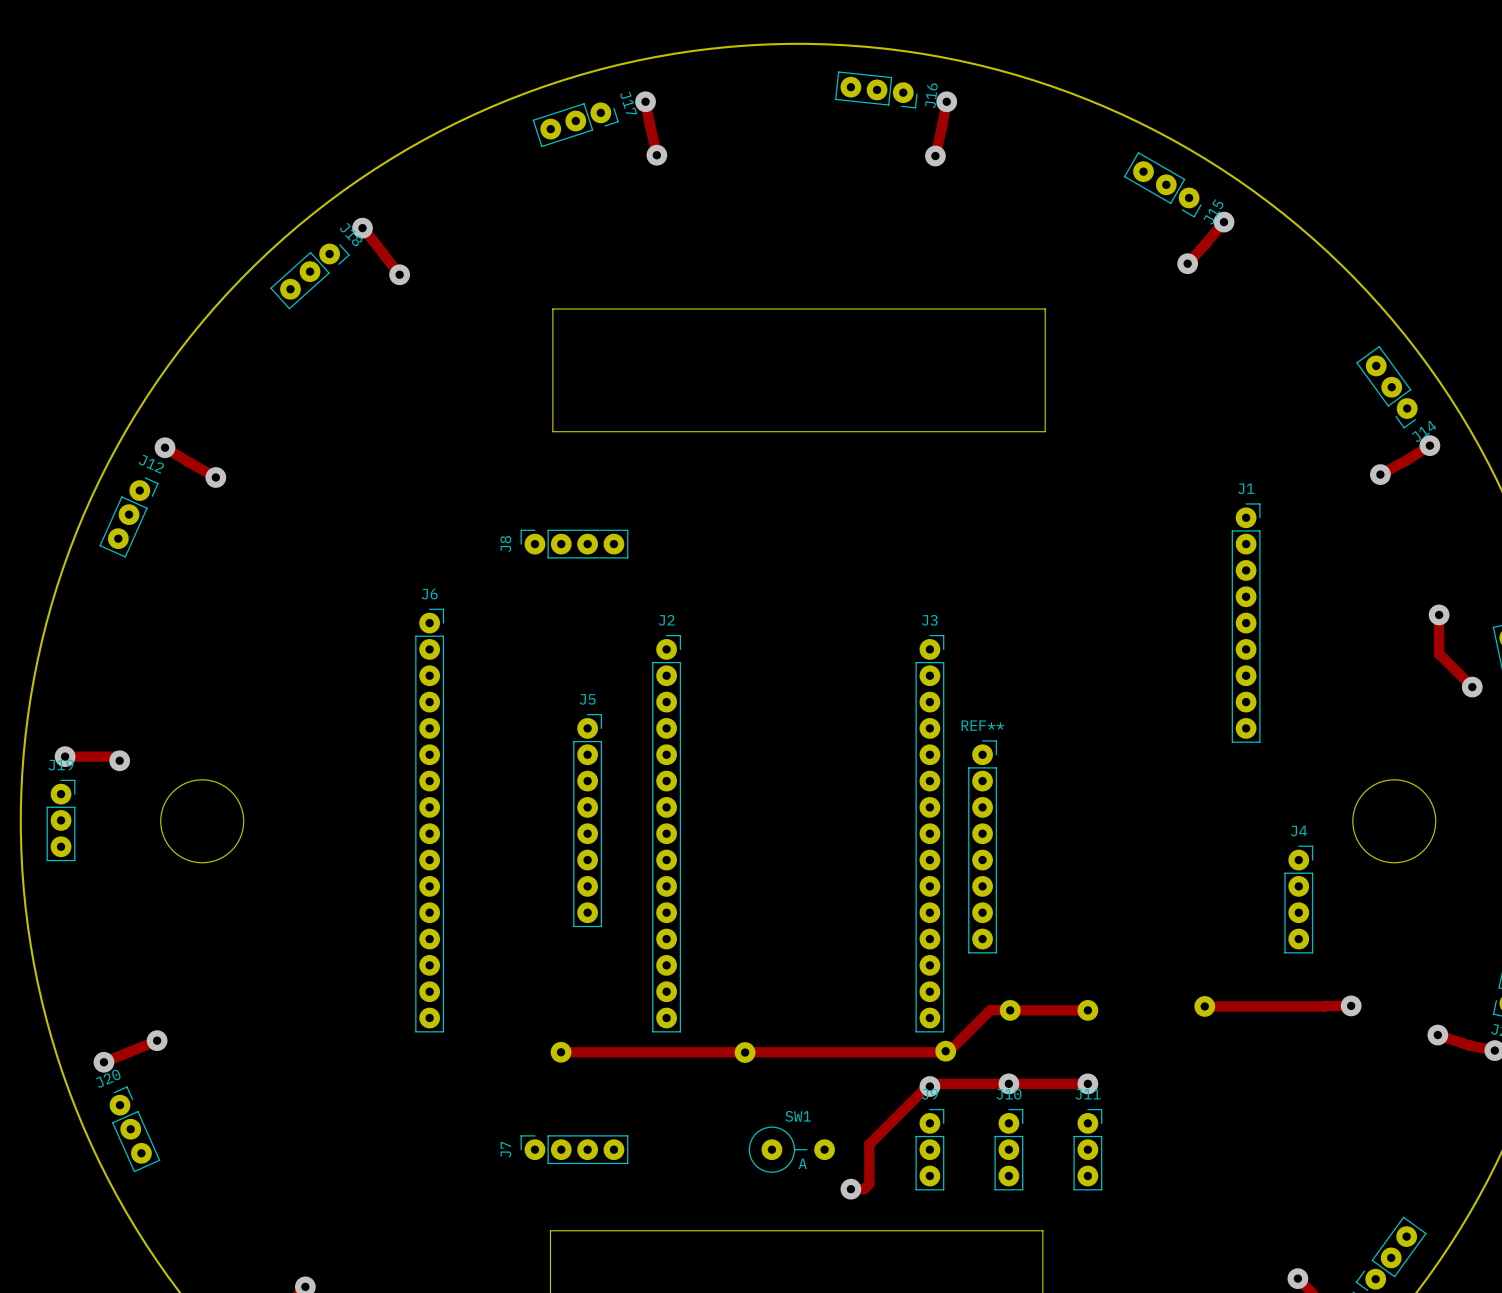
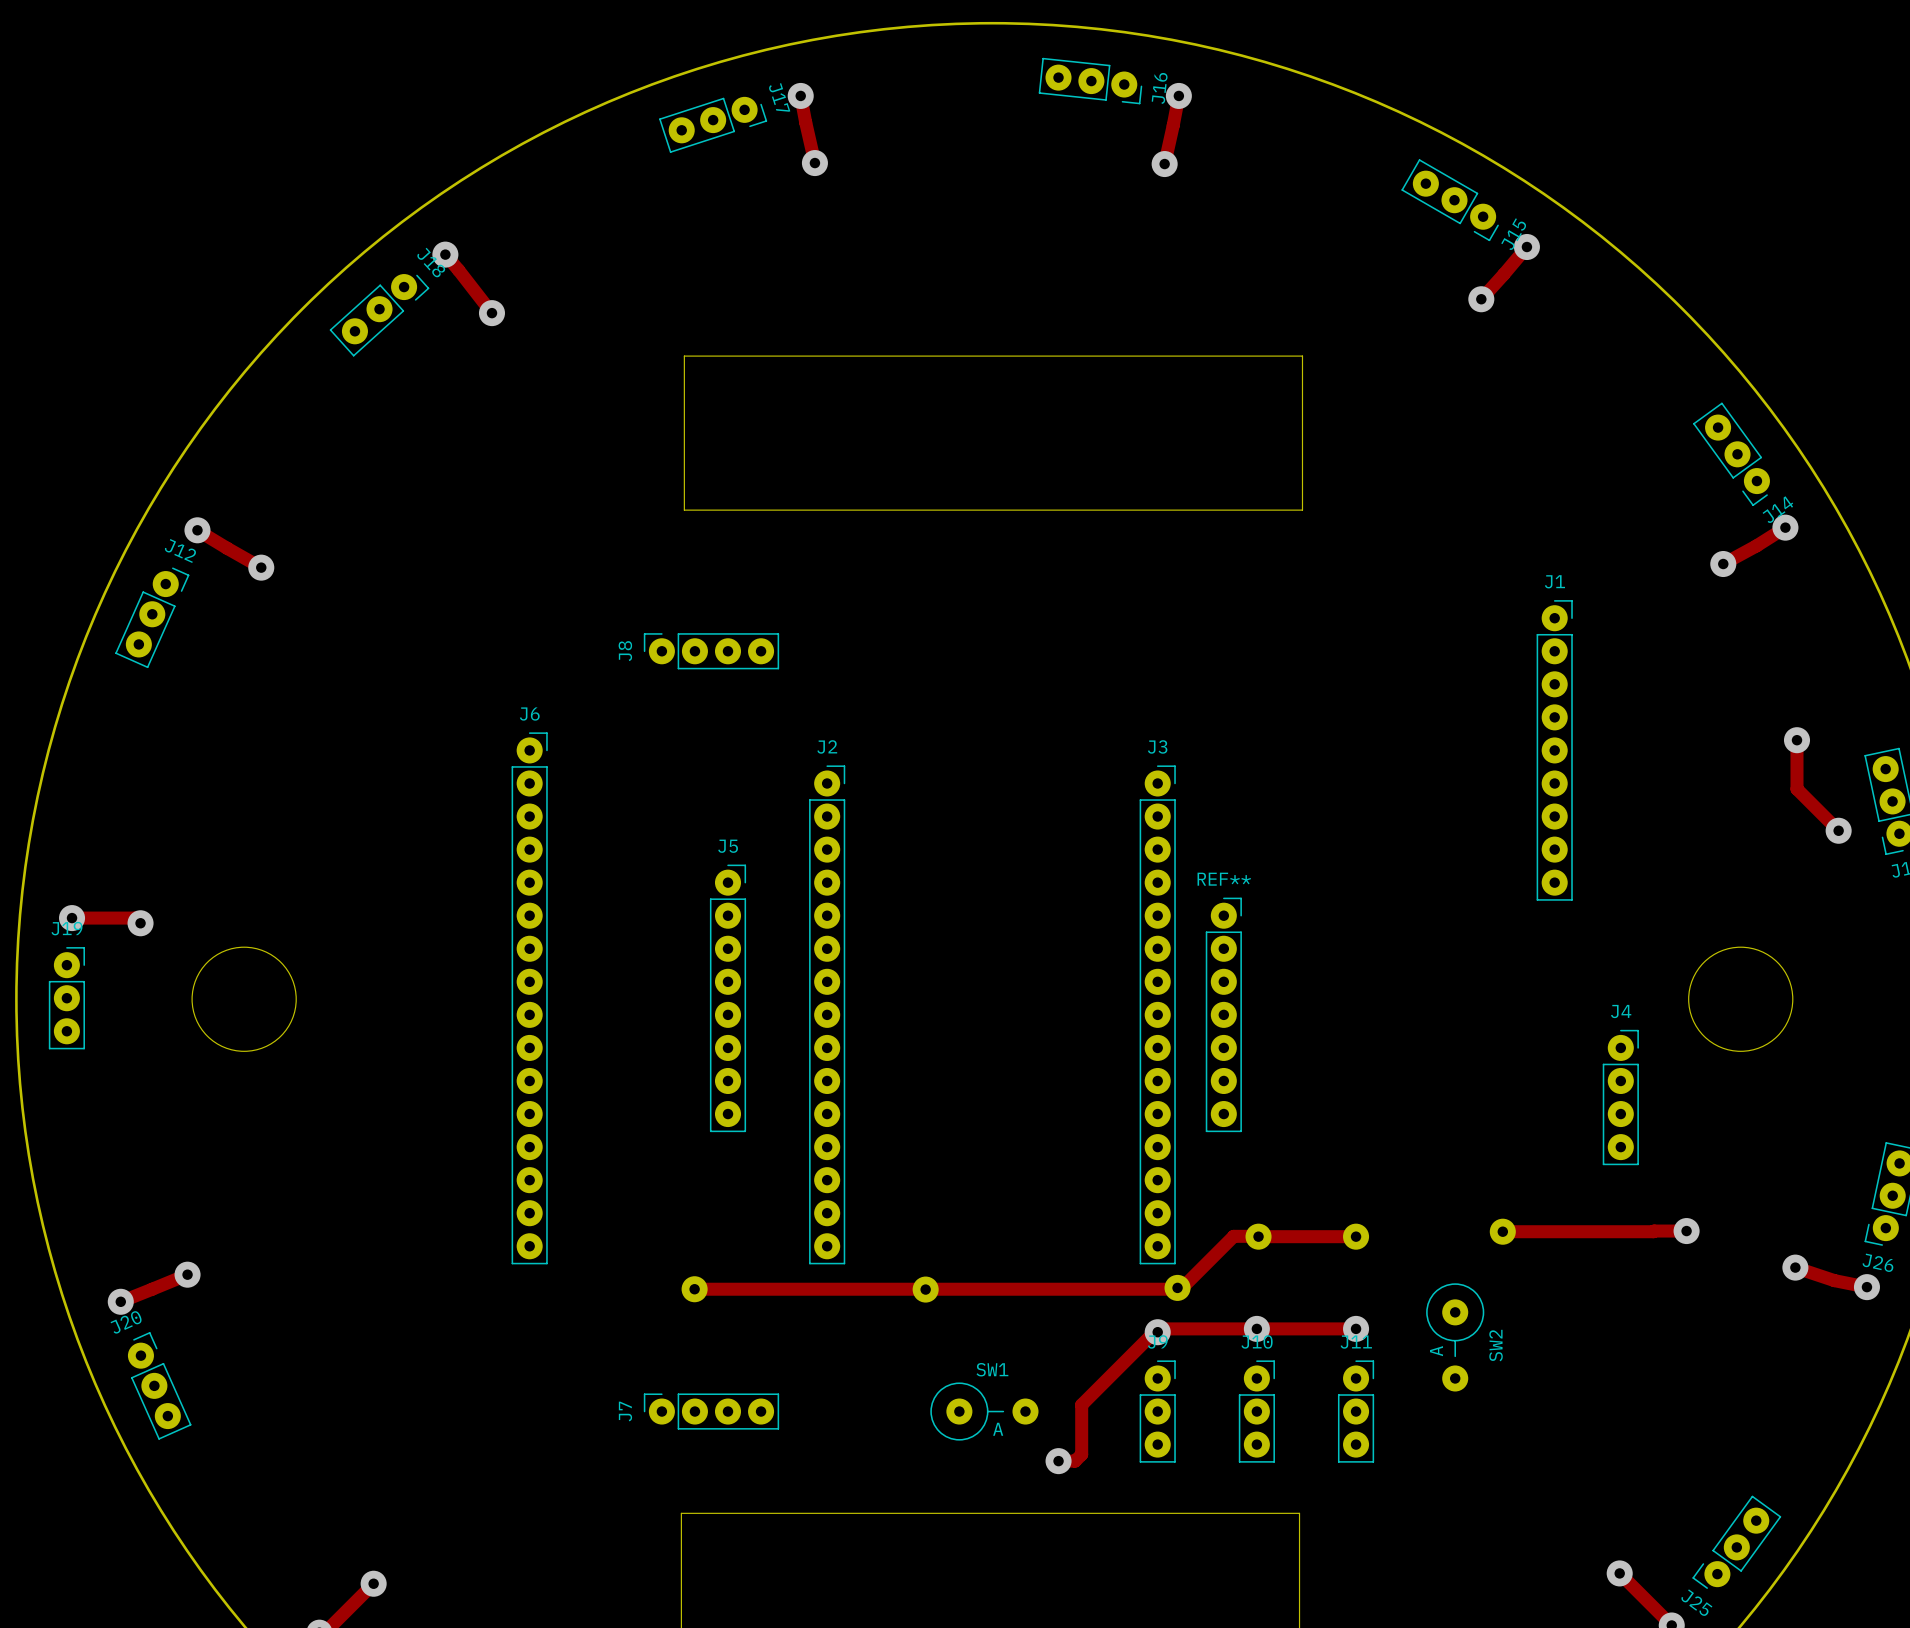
REF**: none -> (1223, 1014)
REF**: (982, 846) -> none
SW2: none -> (1455, 1337)

